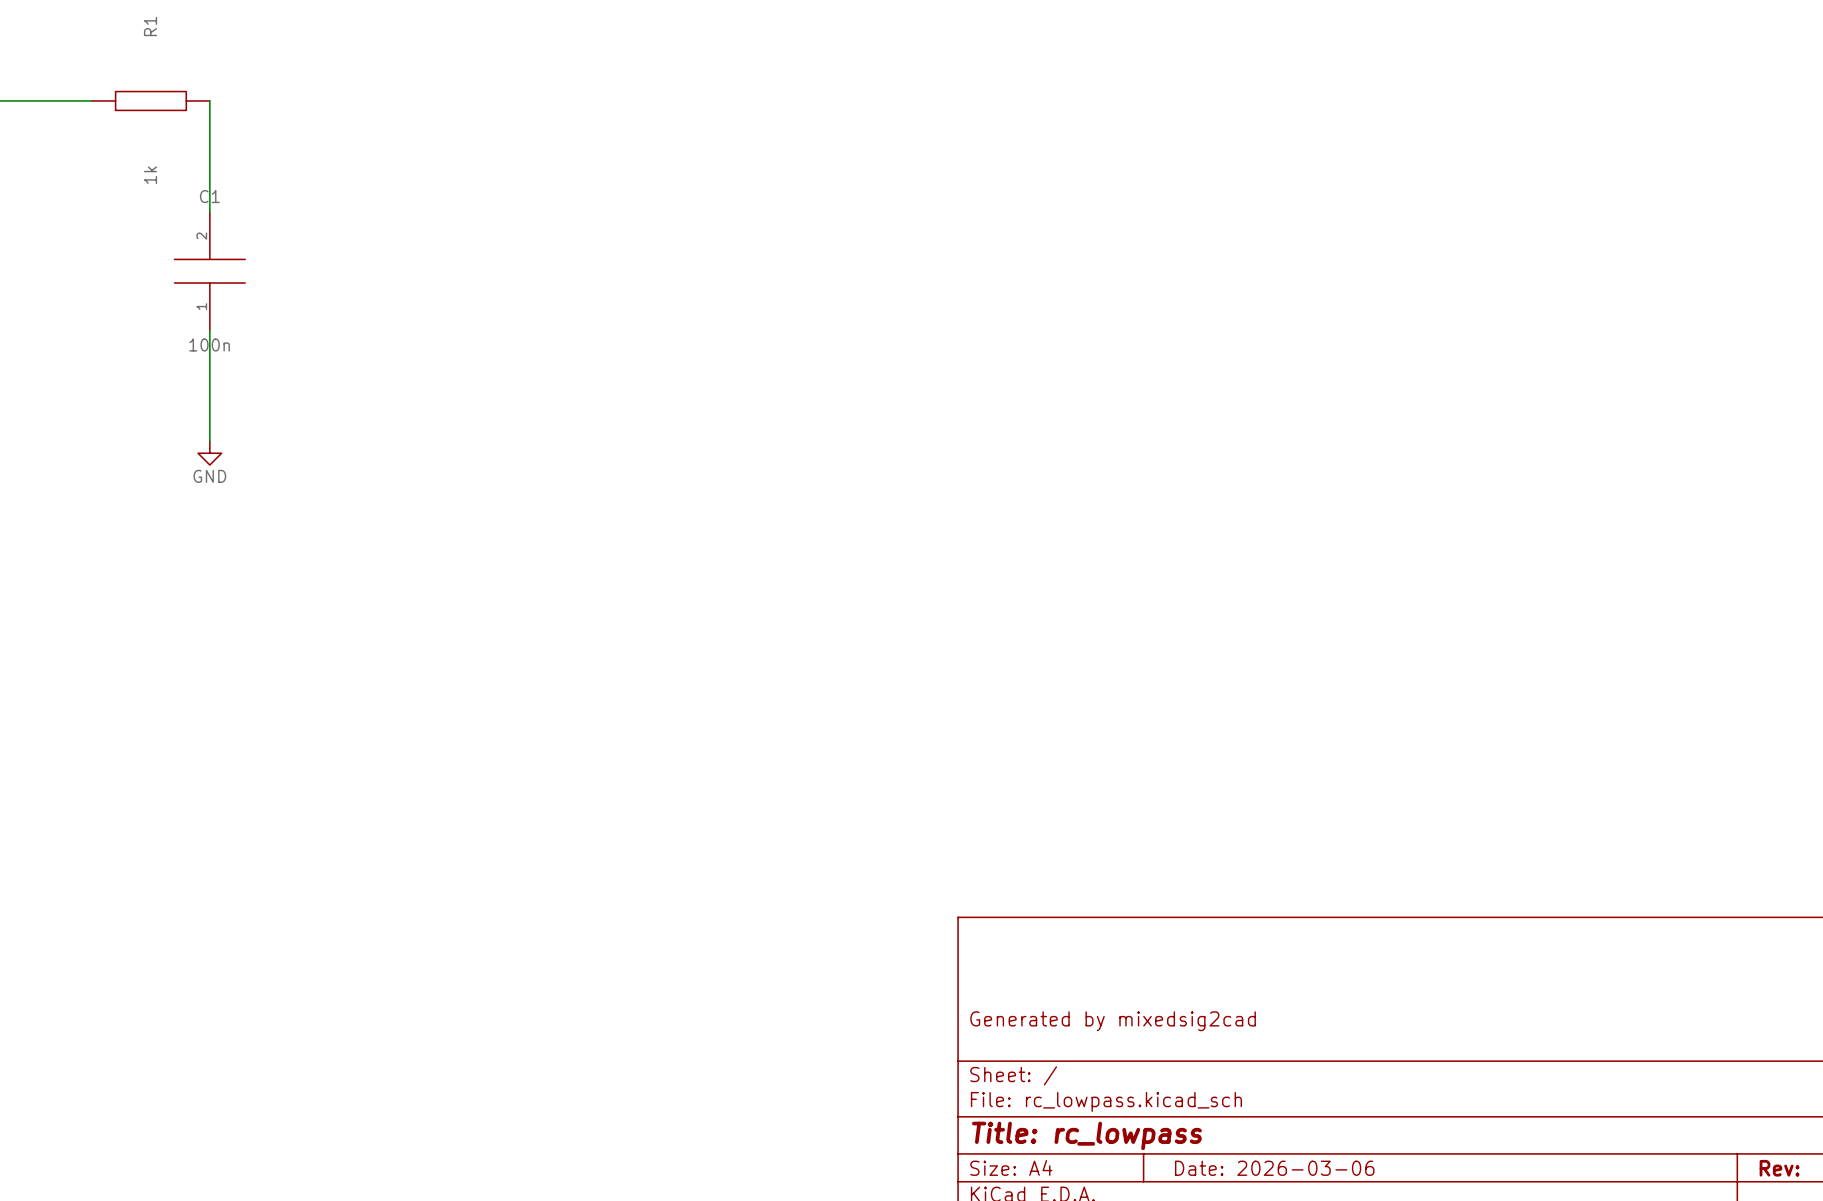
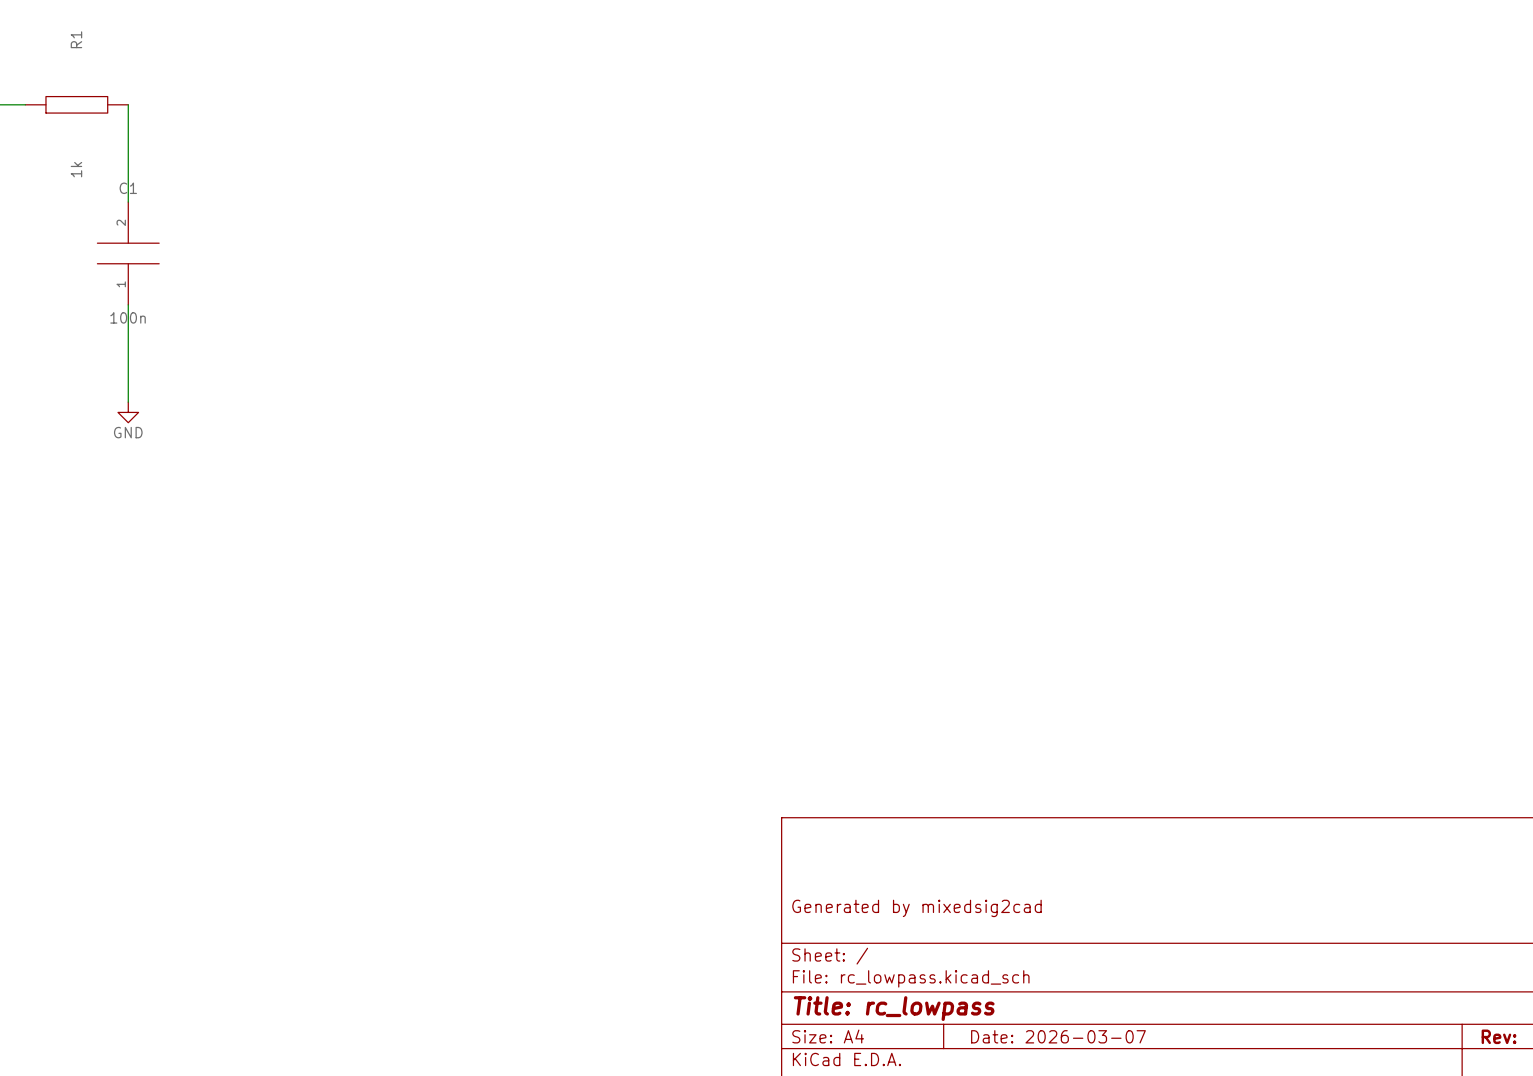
title block: Date: 2026-03-06 (1274, 1168) -> Date: 2026-03-07 (1058, 1036)

